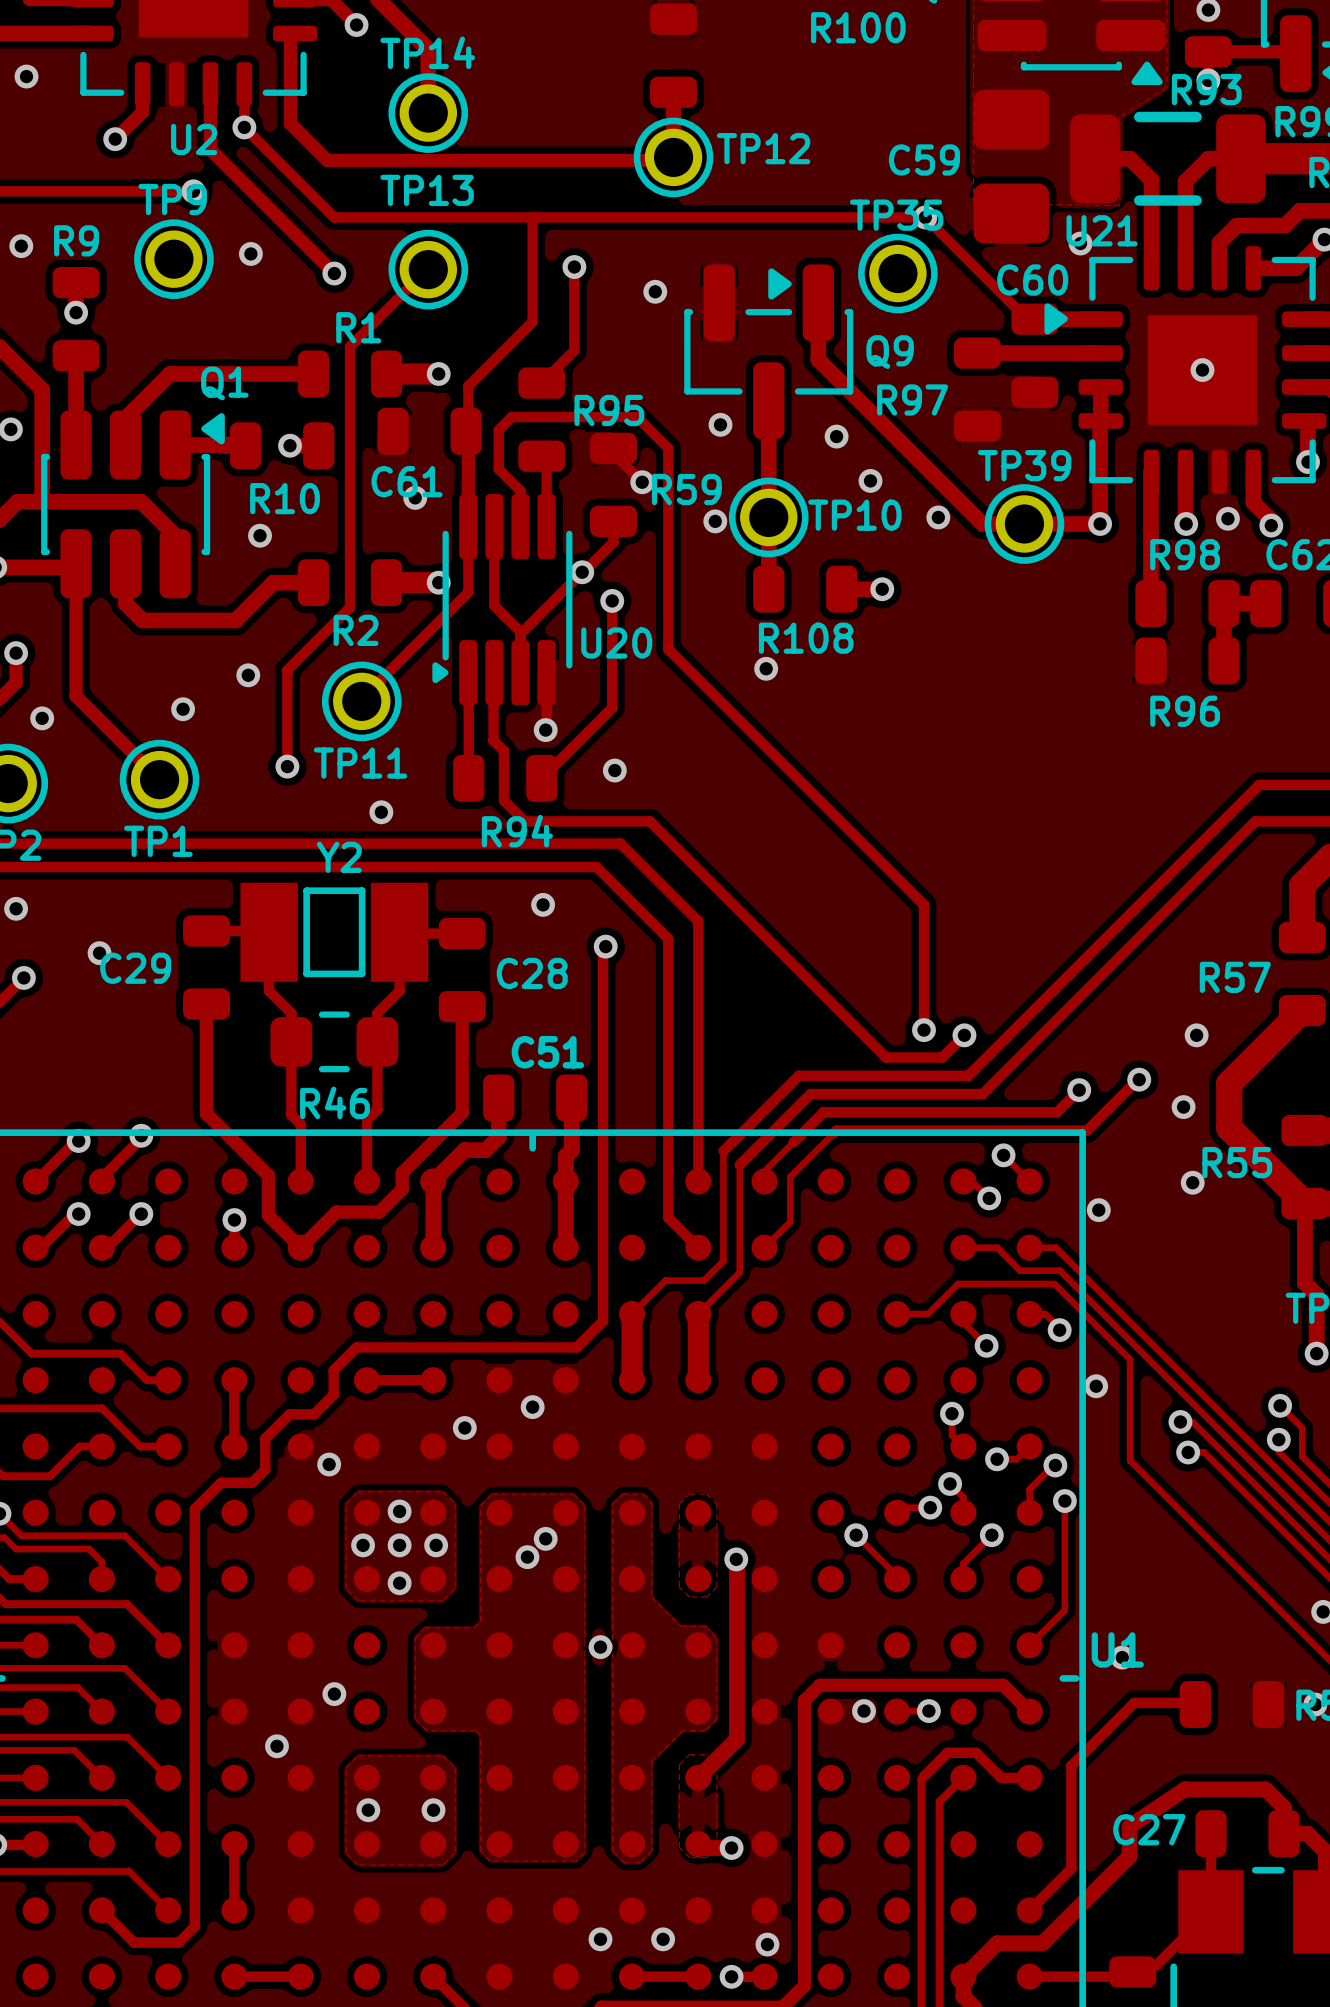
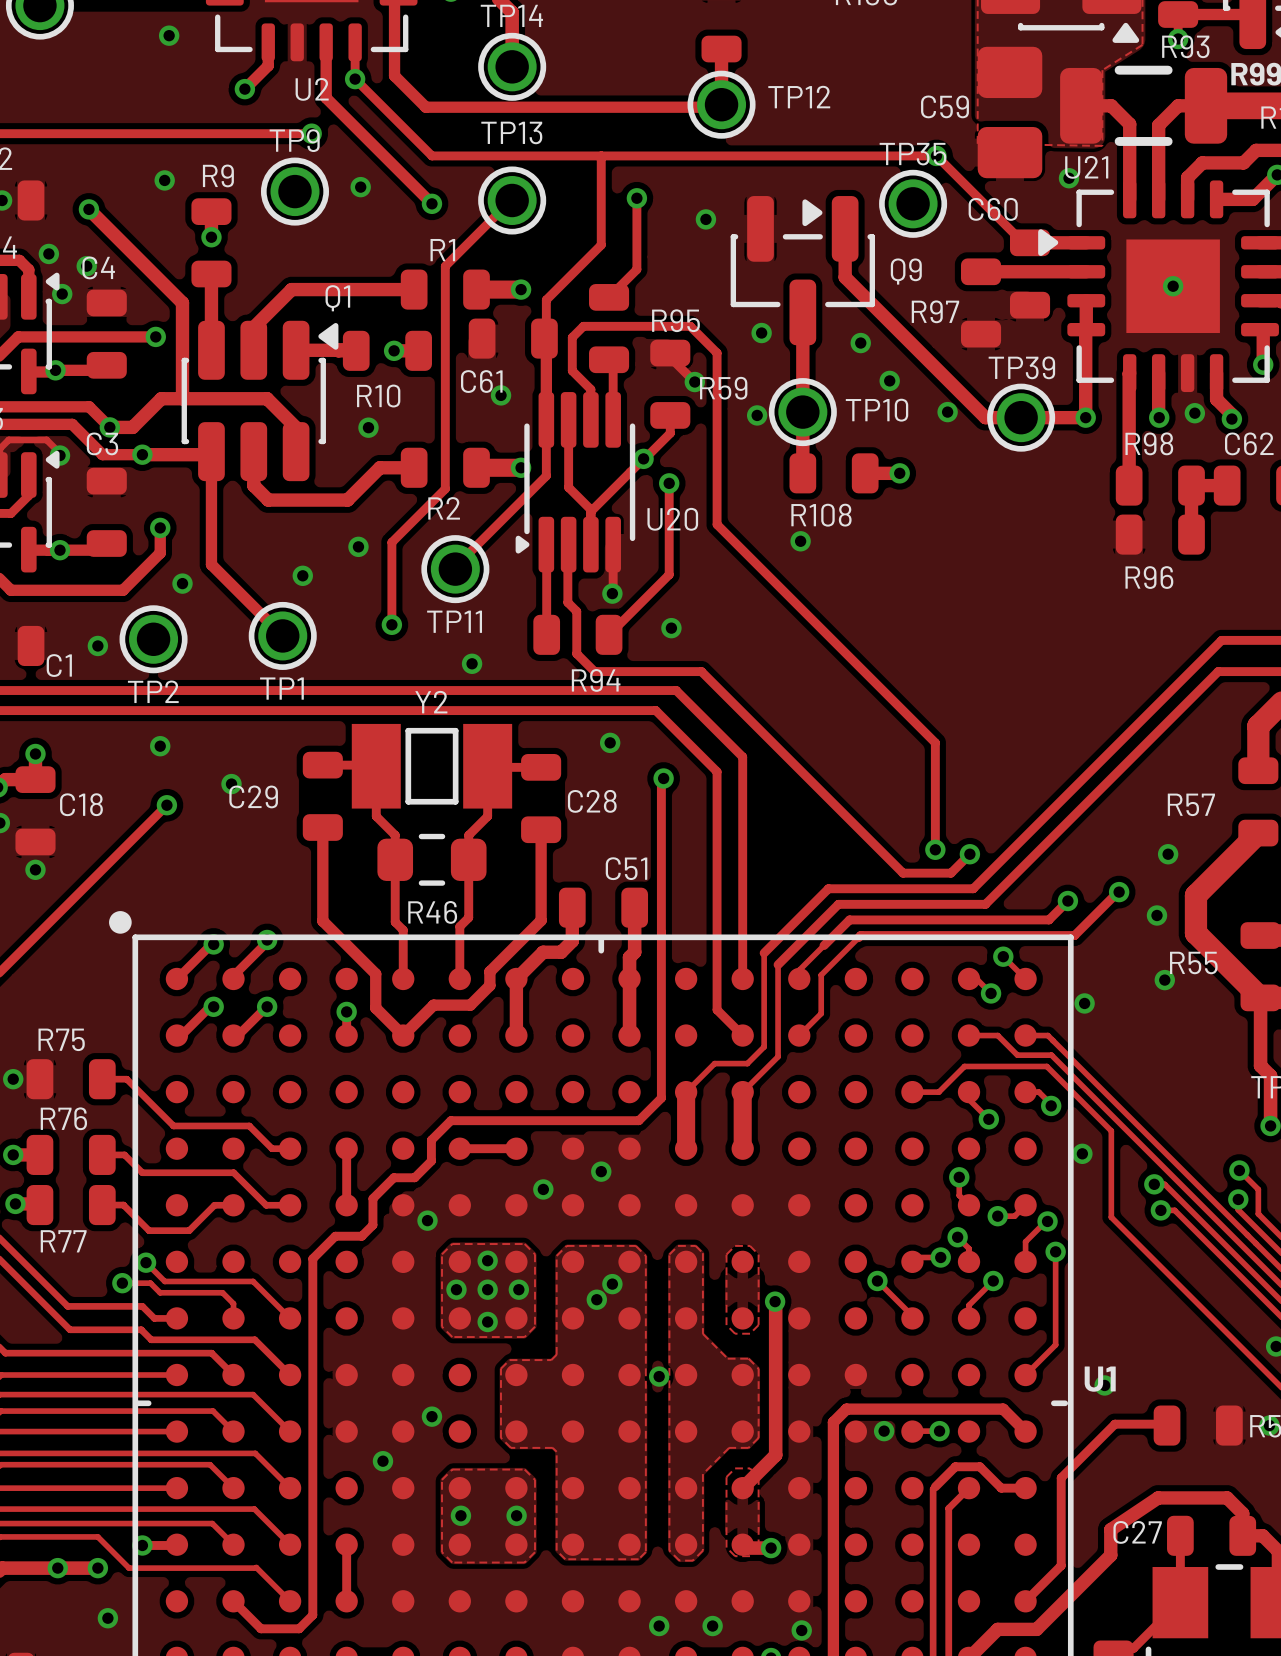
C60 name position: C60 (1032, 279) -> C60 (993, 209)

